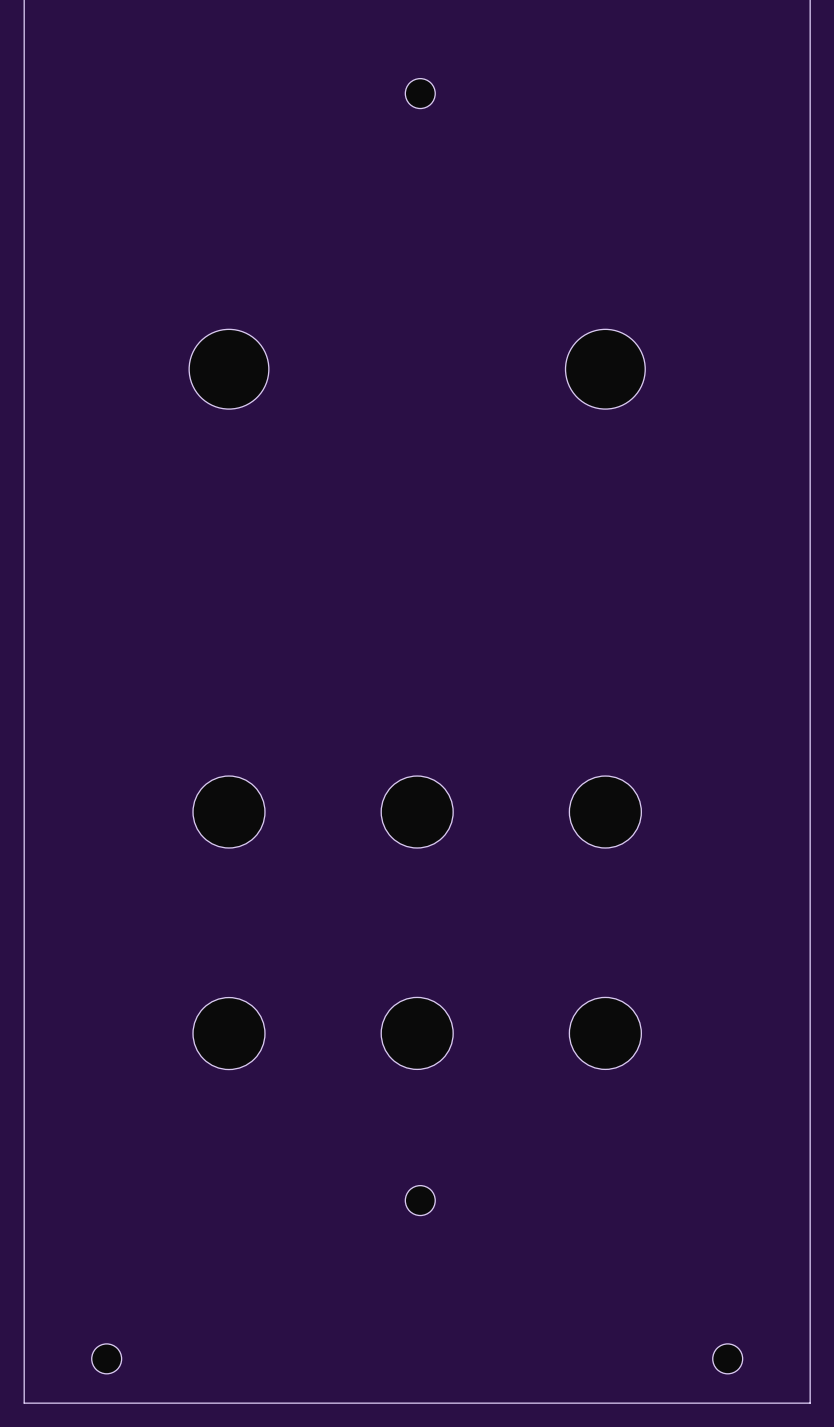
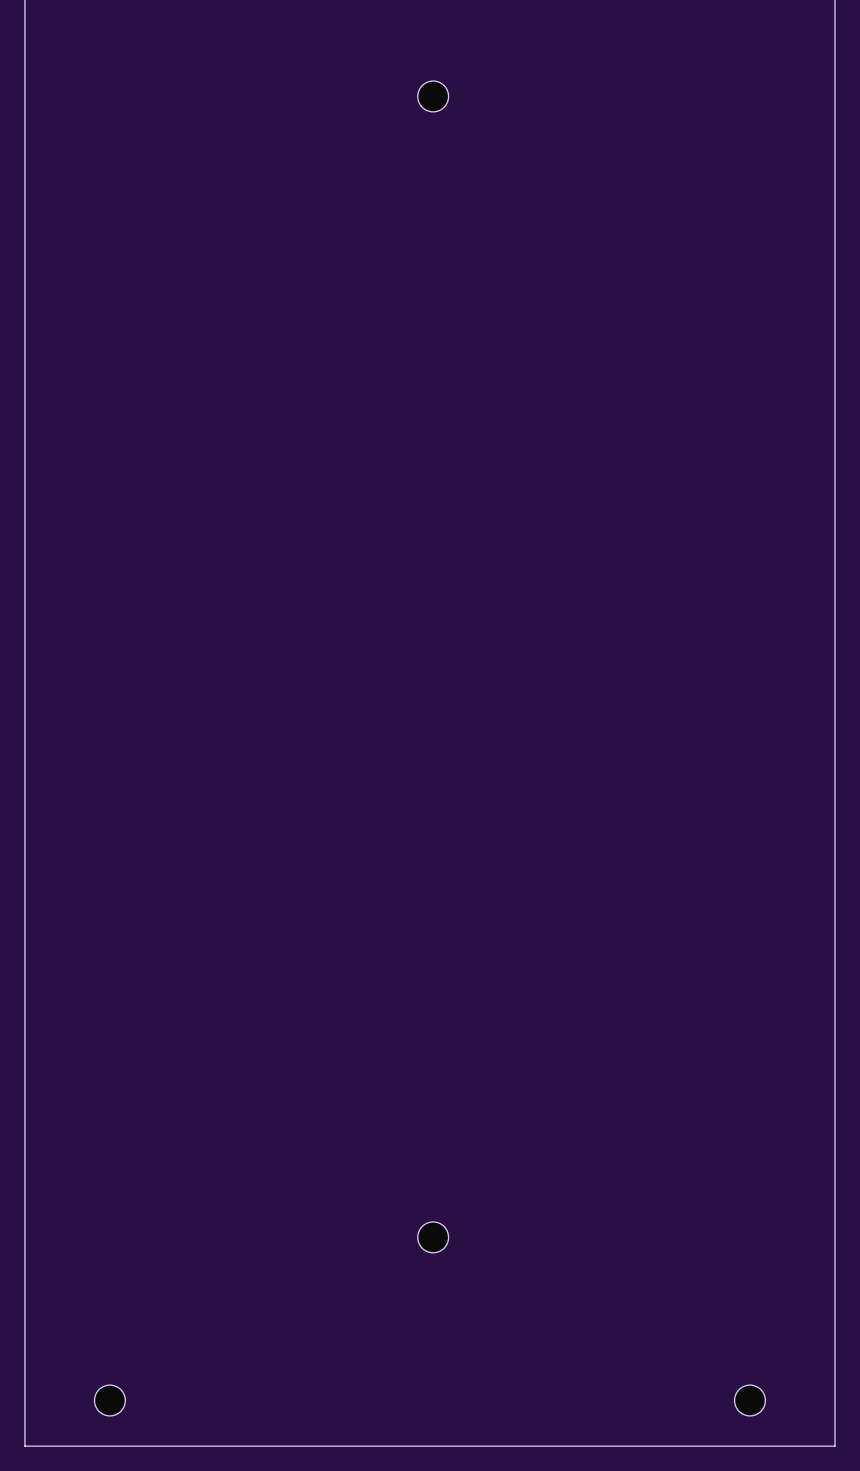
part: (228, 369) -> none
part: (605, 369) -> none
part: (228, 812) -> none
part: (417, 812) -> none
part: (605, 812) -> none
part: (228, 1033) -> none
part: (417, 1033) -> none
part: (605, 1033) -> none

